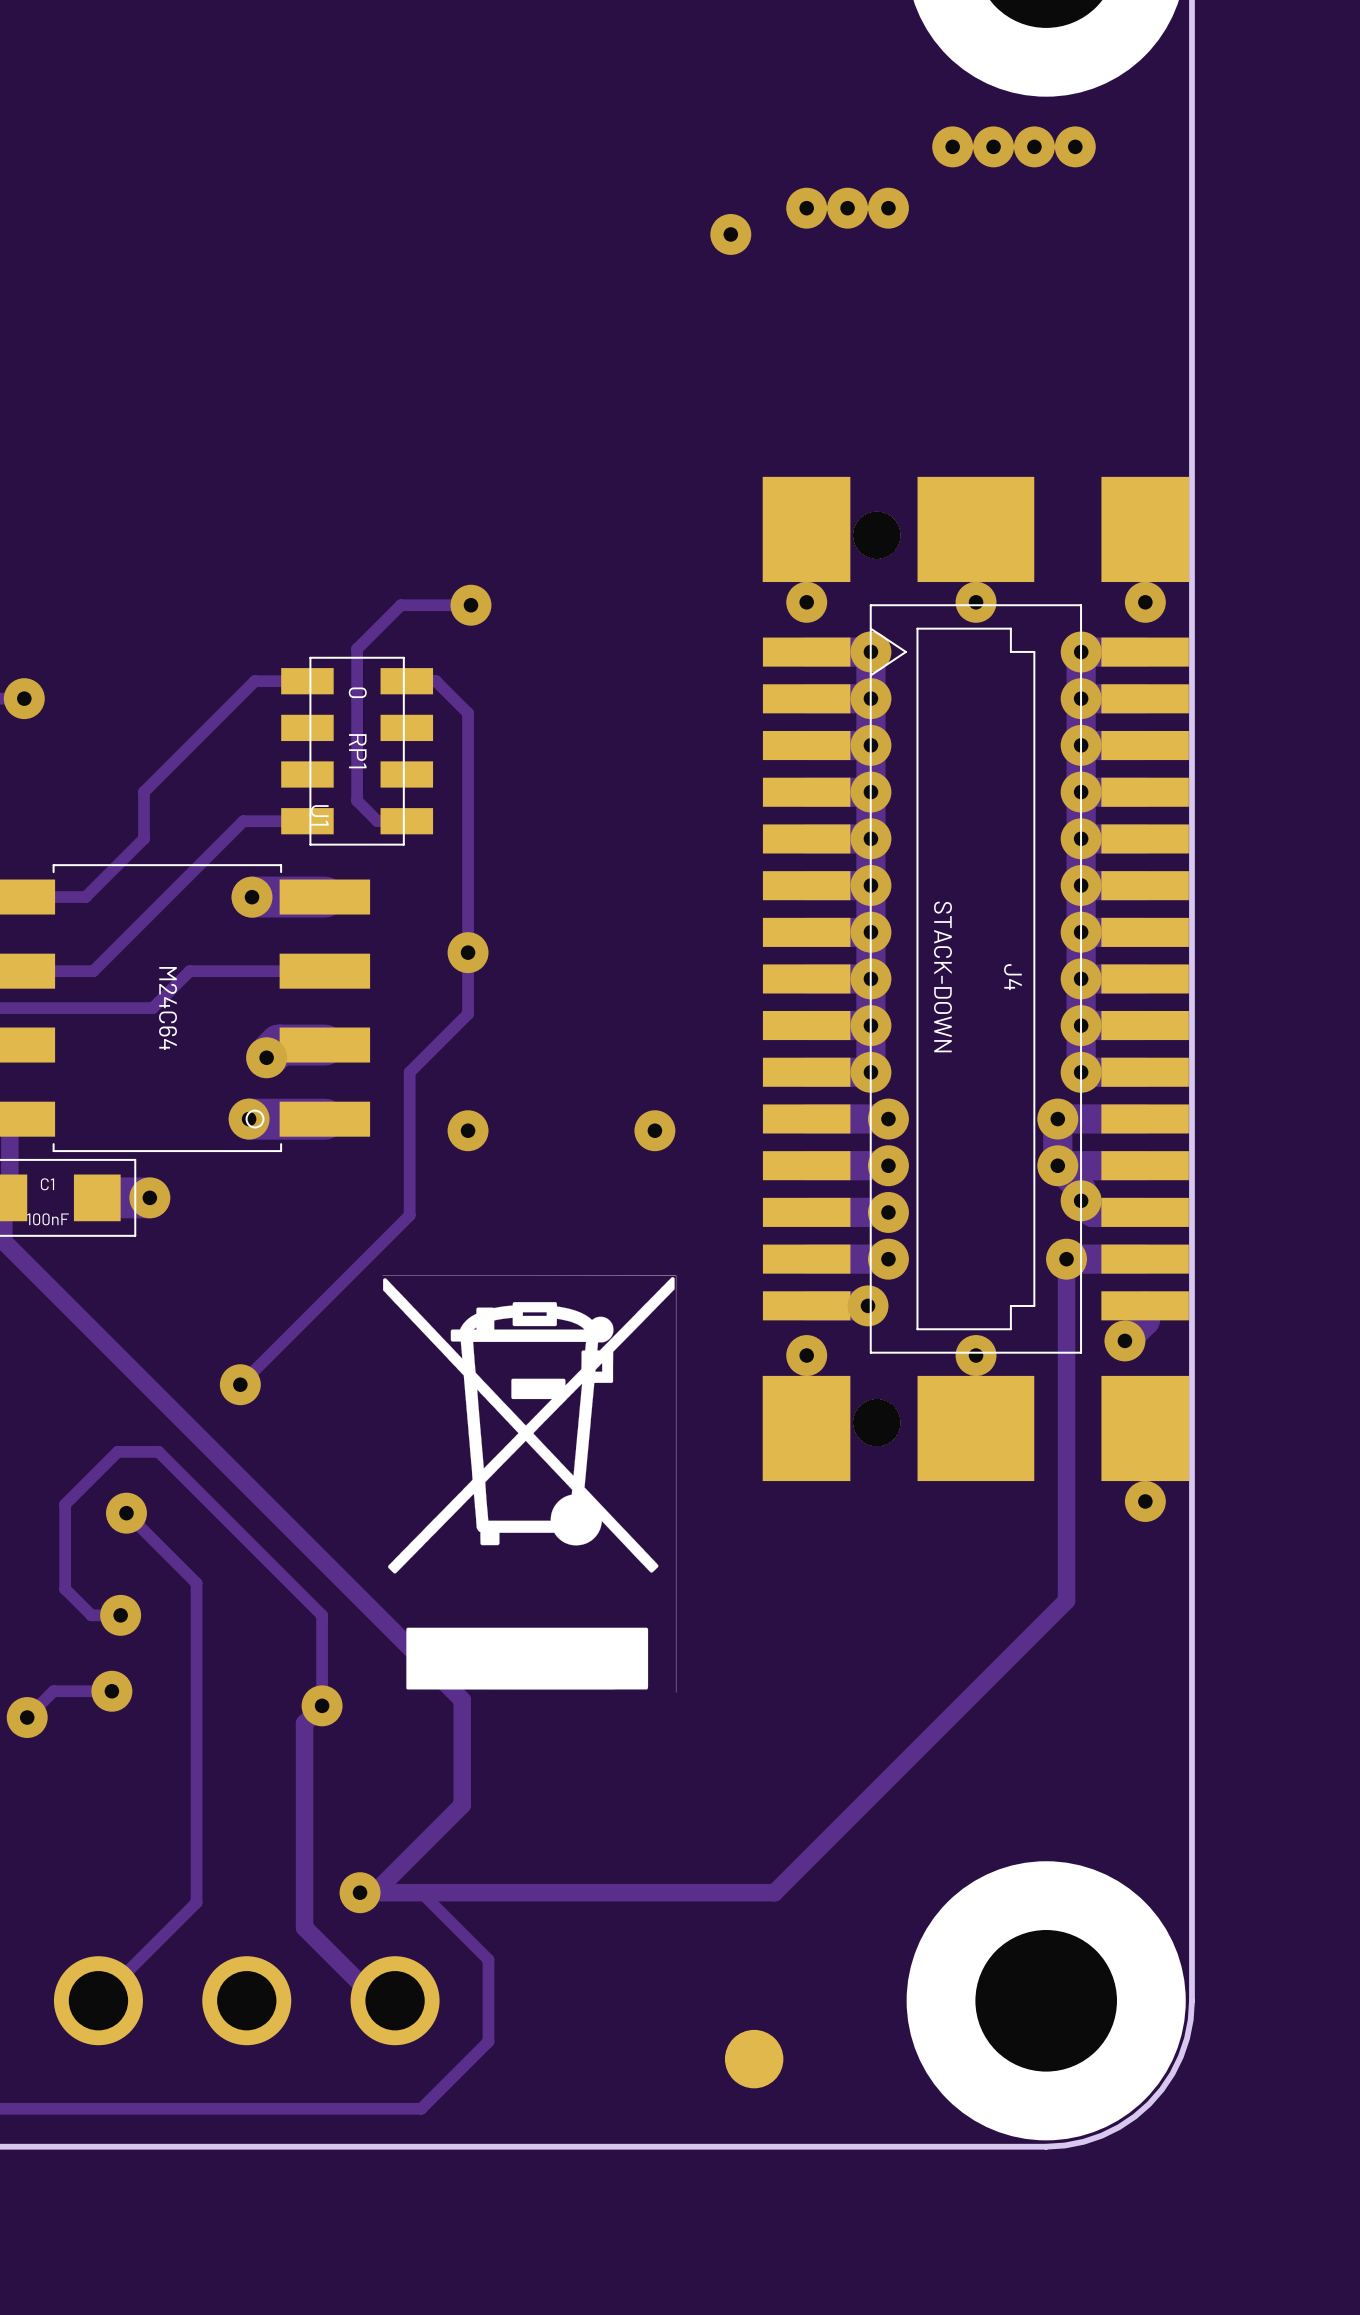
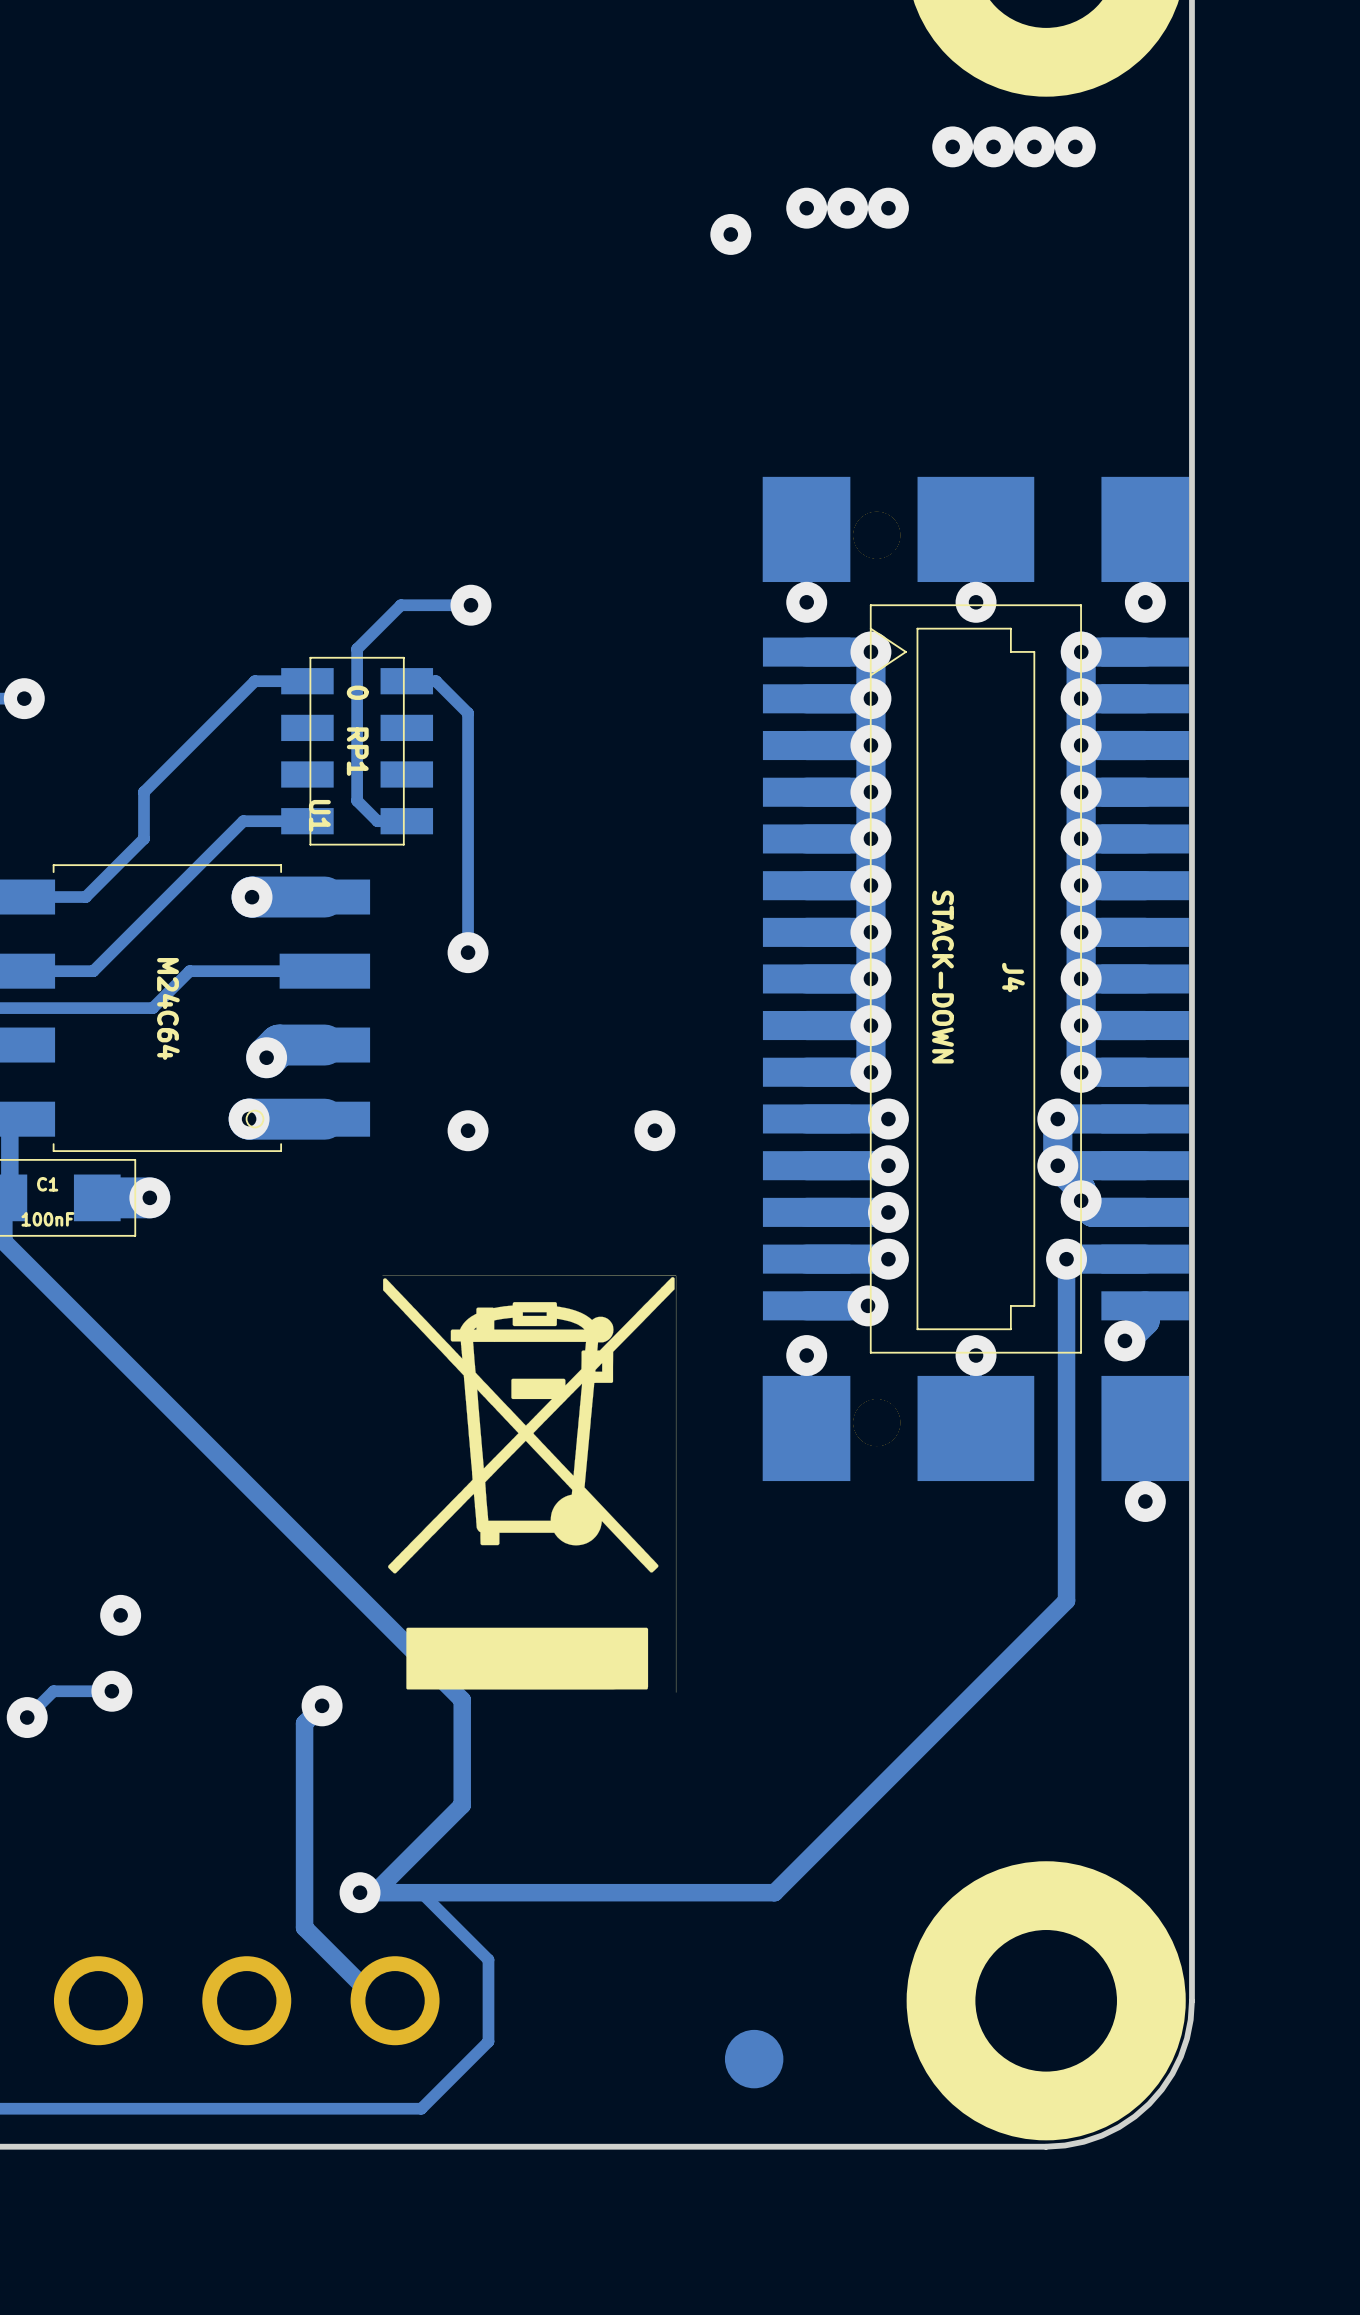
track: (468, 952) (468, 1013) (409, 1072) (409, 1215) (240, 1384) -> none
via: (240, 1384) -> none
track: (126, 1513) (196, 1583) (196, 1902) (98, 2000) -> none
via: (126, 1513) -> none
track: (120, 1615) (91, 1615) (65, 1589) (65, 1504) (117, 1451) (158, 1451) (322, 1615) (322, 1705) -> none

